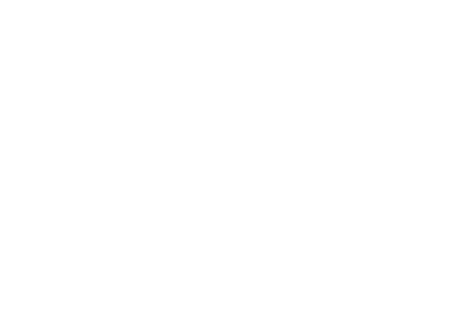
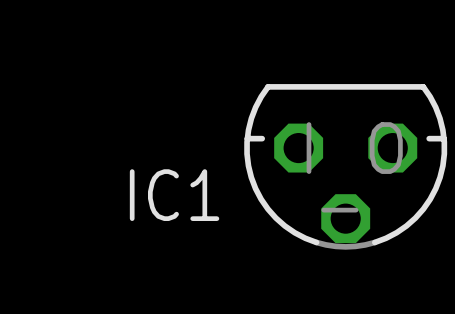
IC1: none -> (345, 166)

